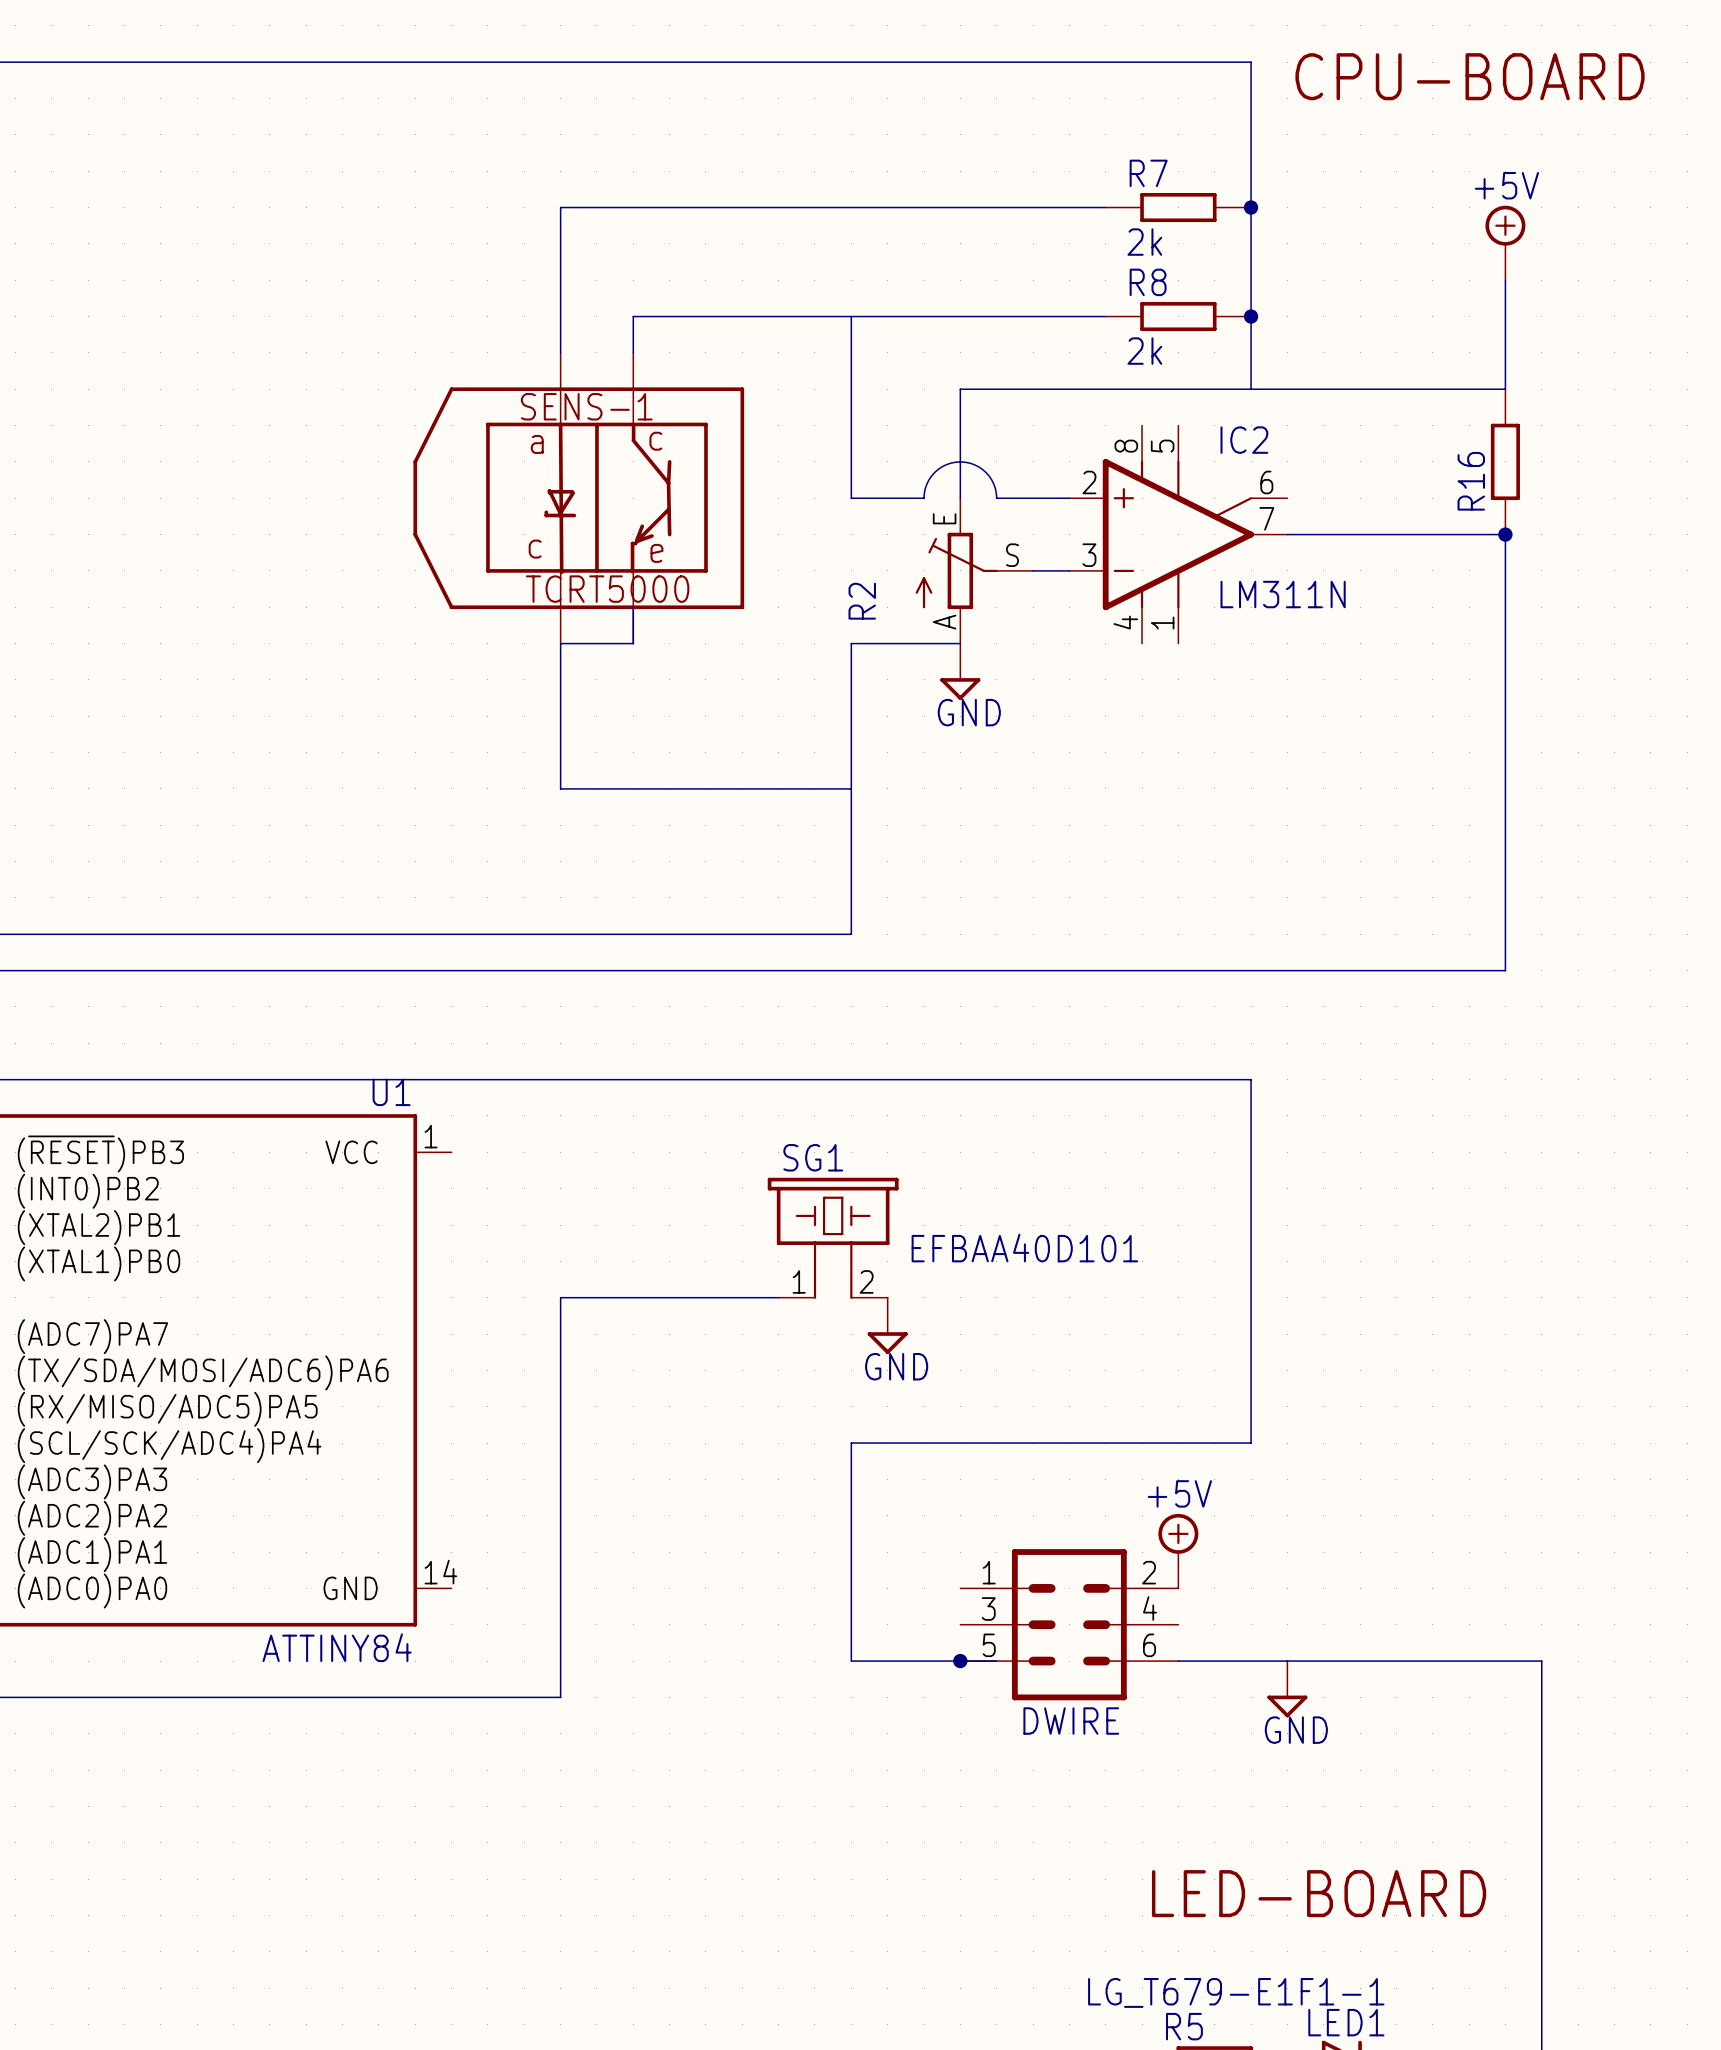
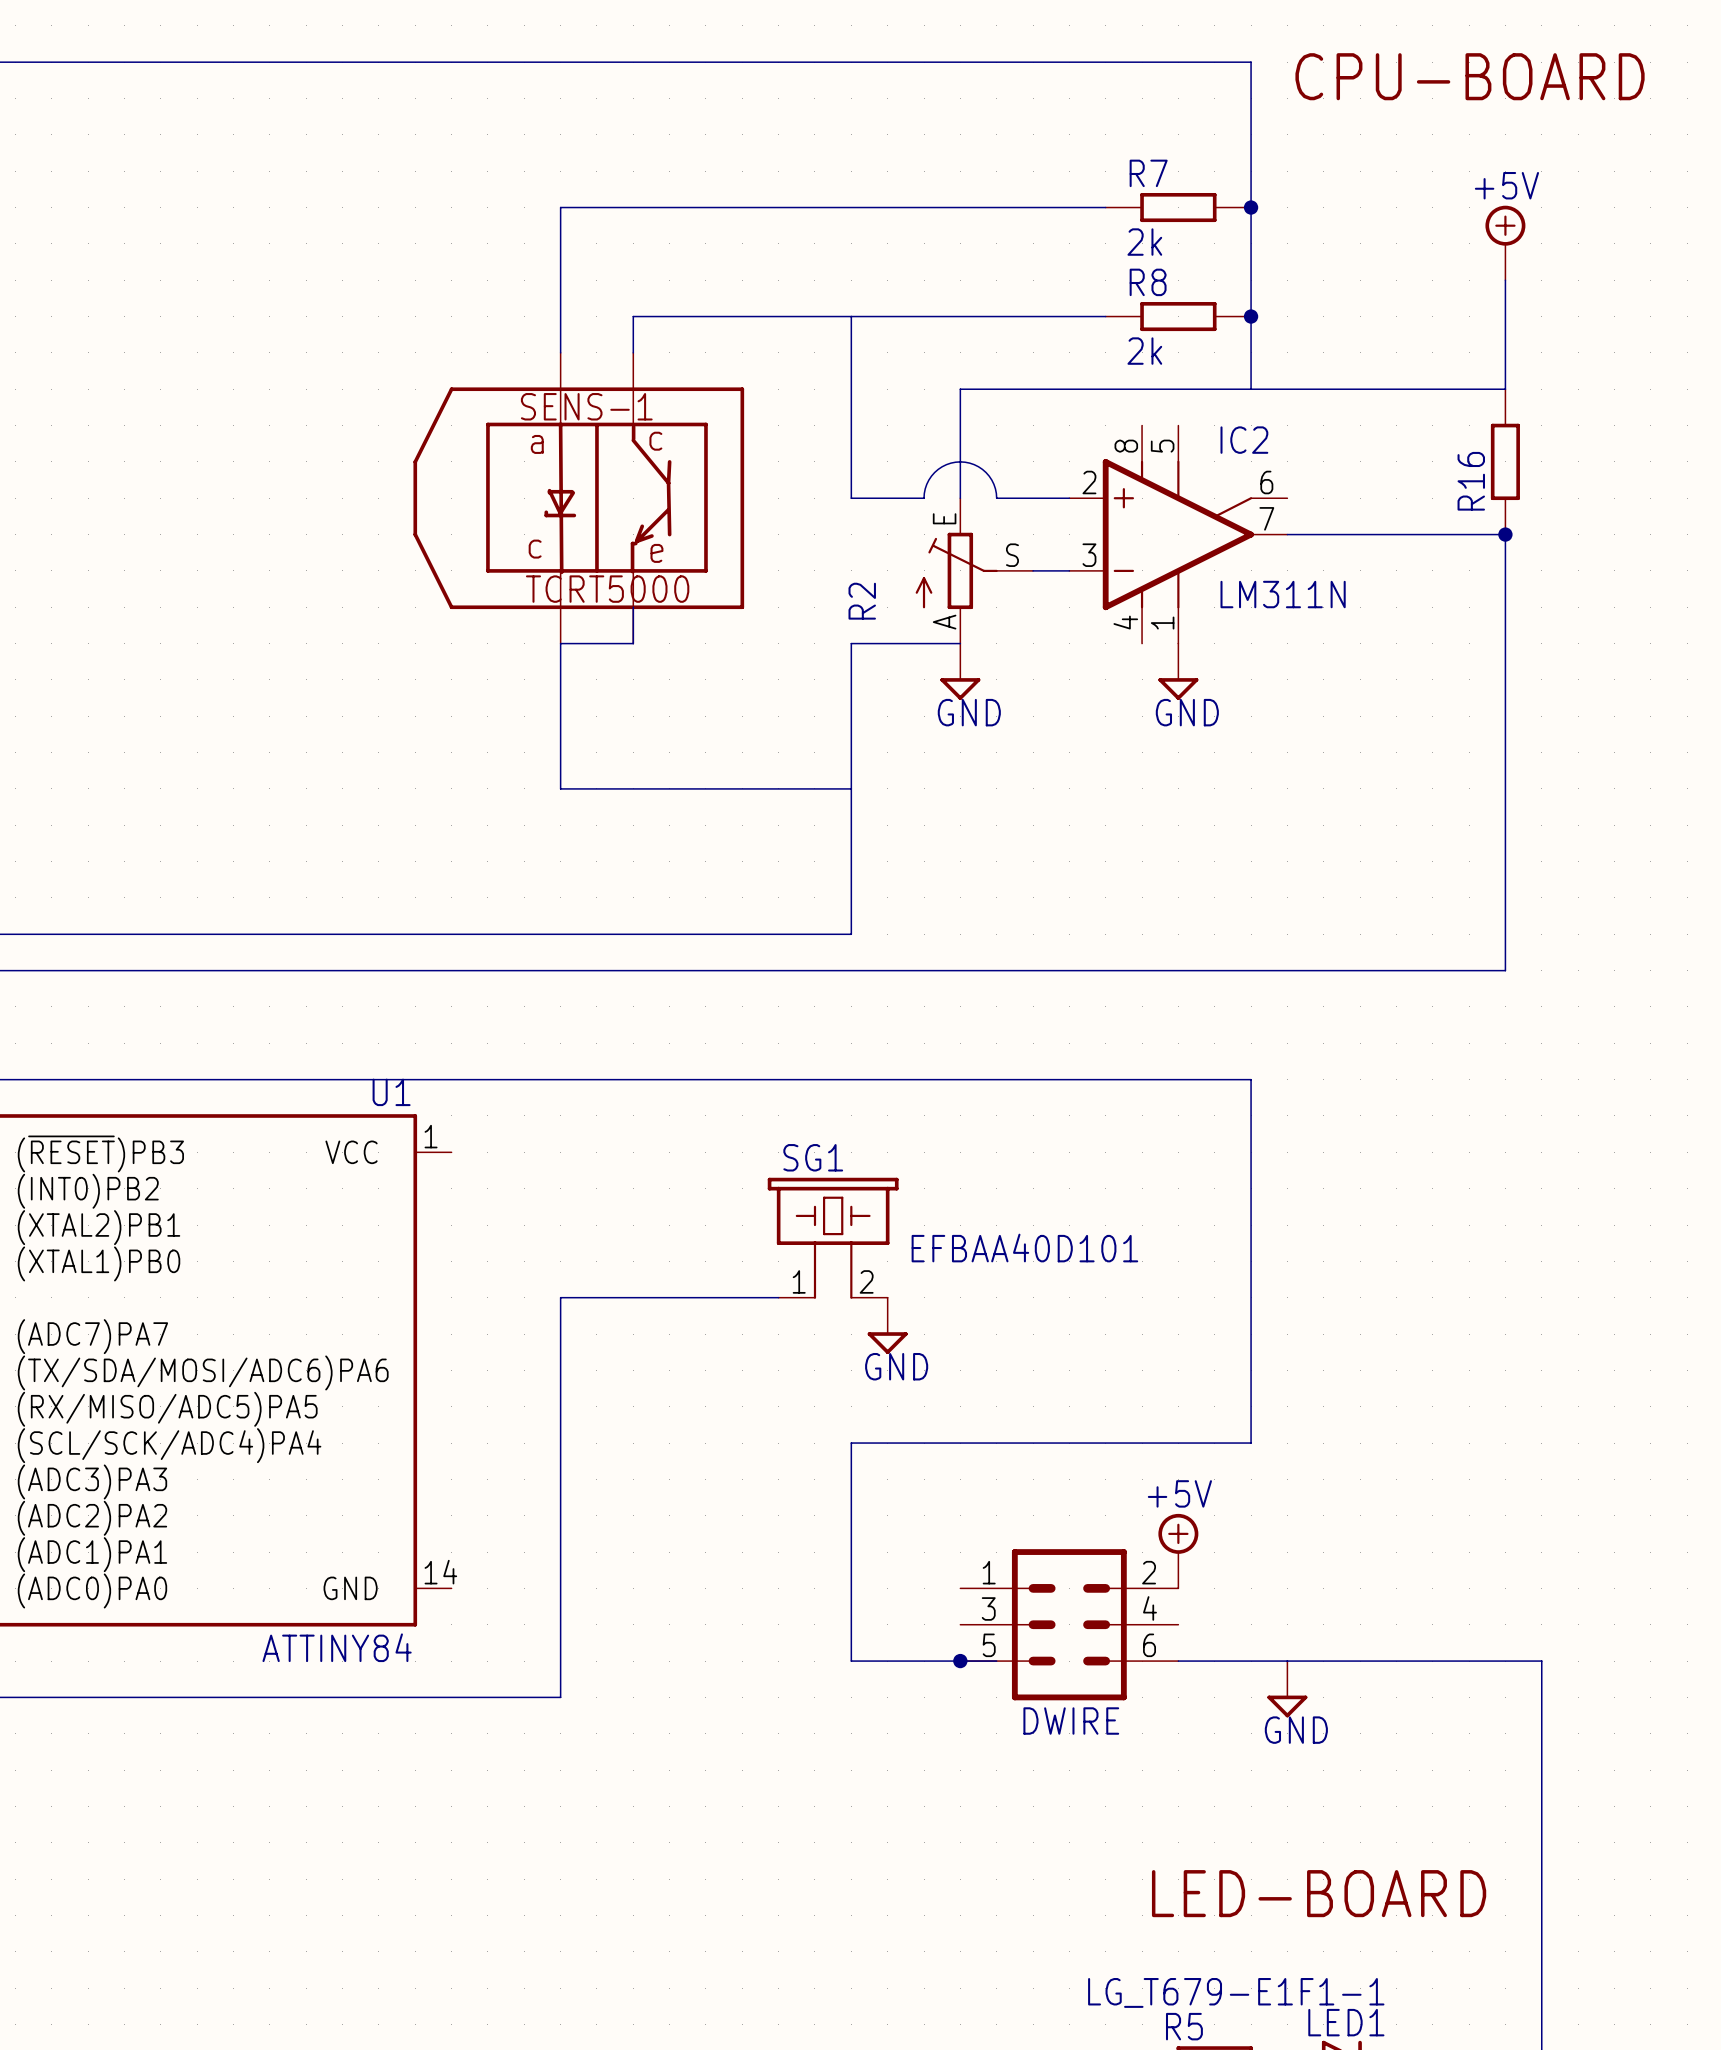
power symbol: none -> GND (1178, 671)

